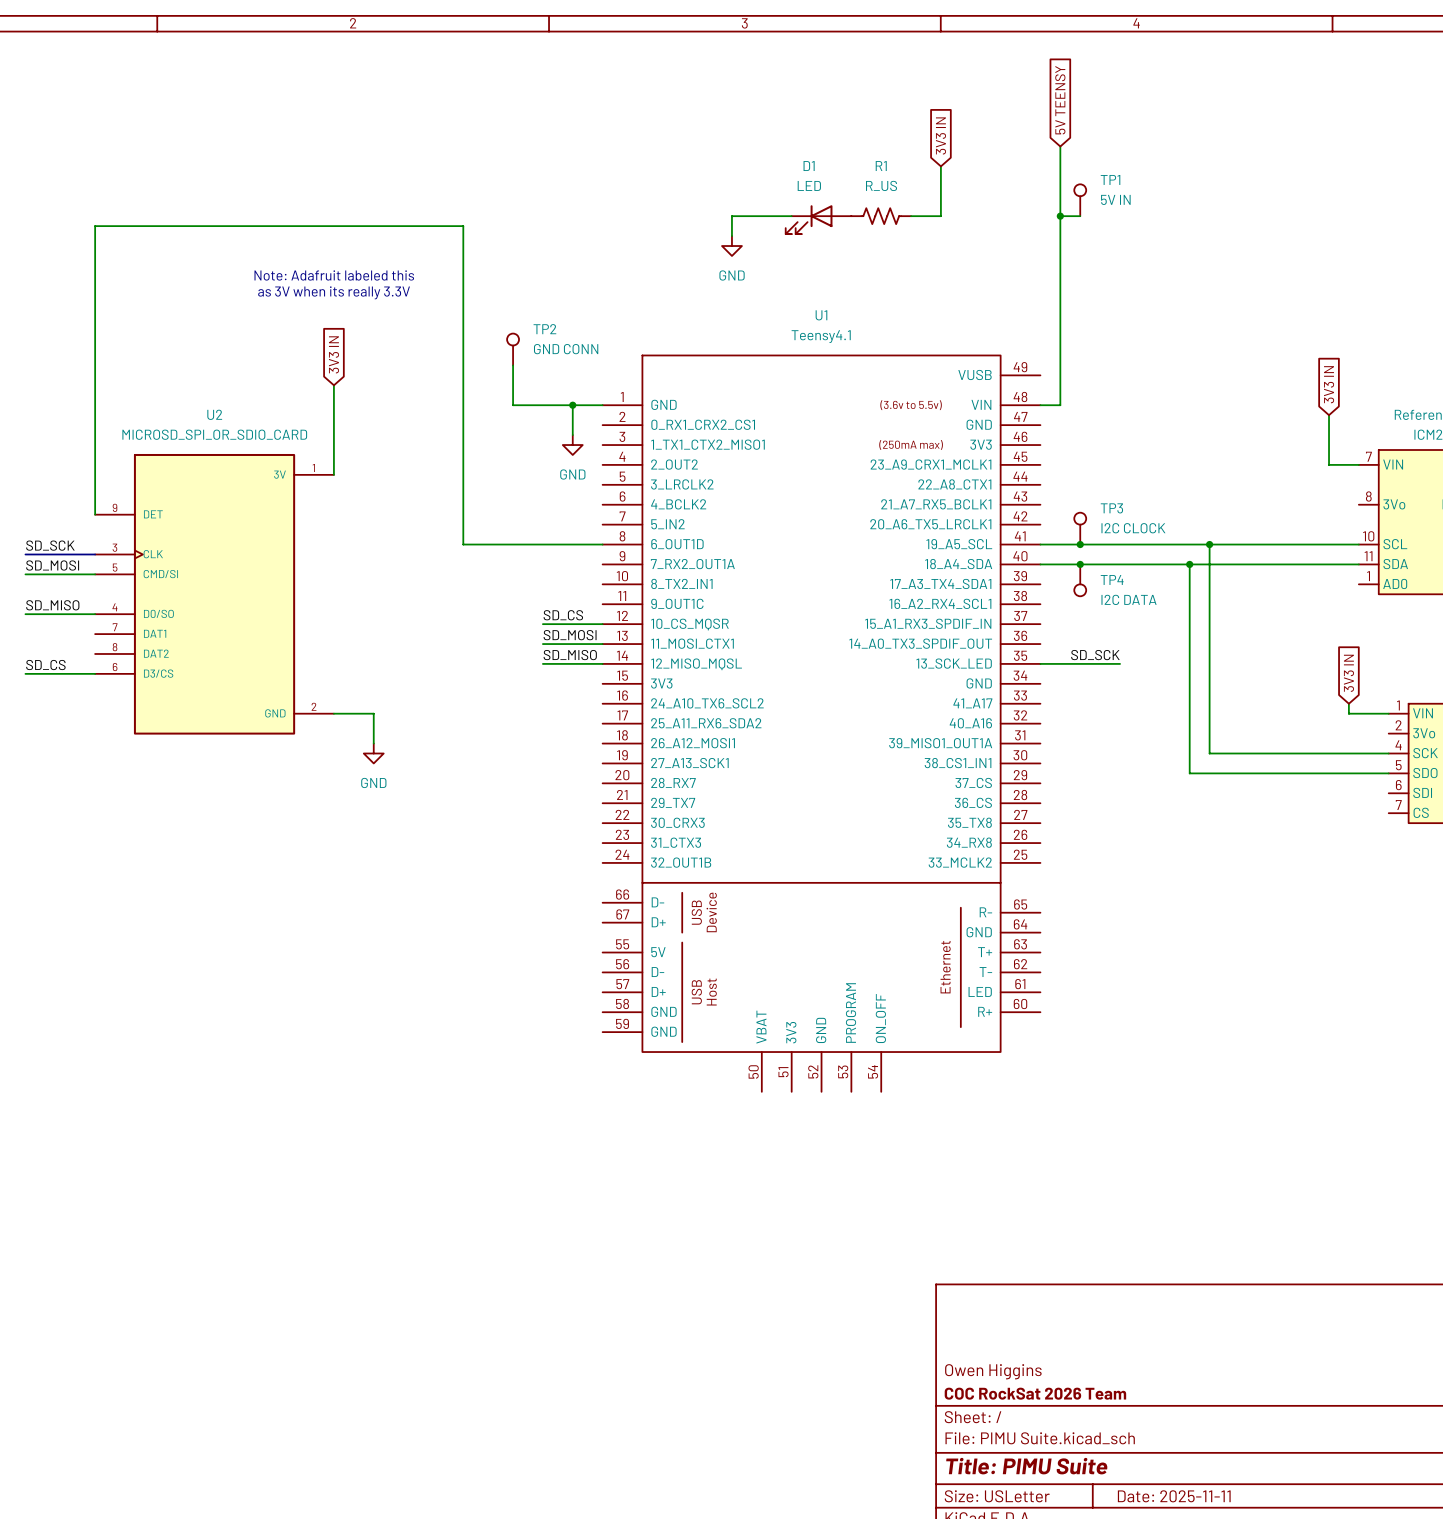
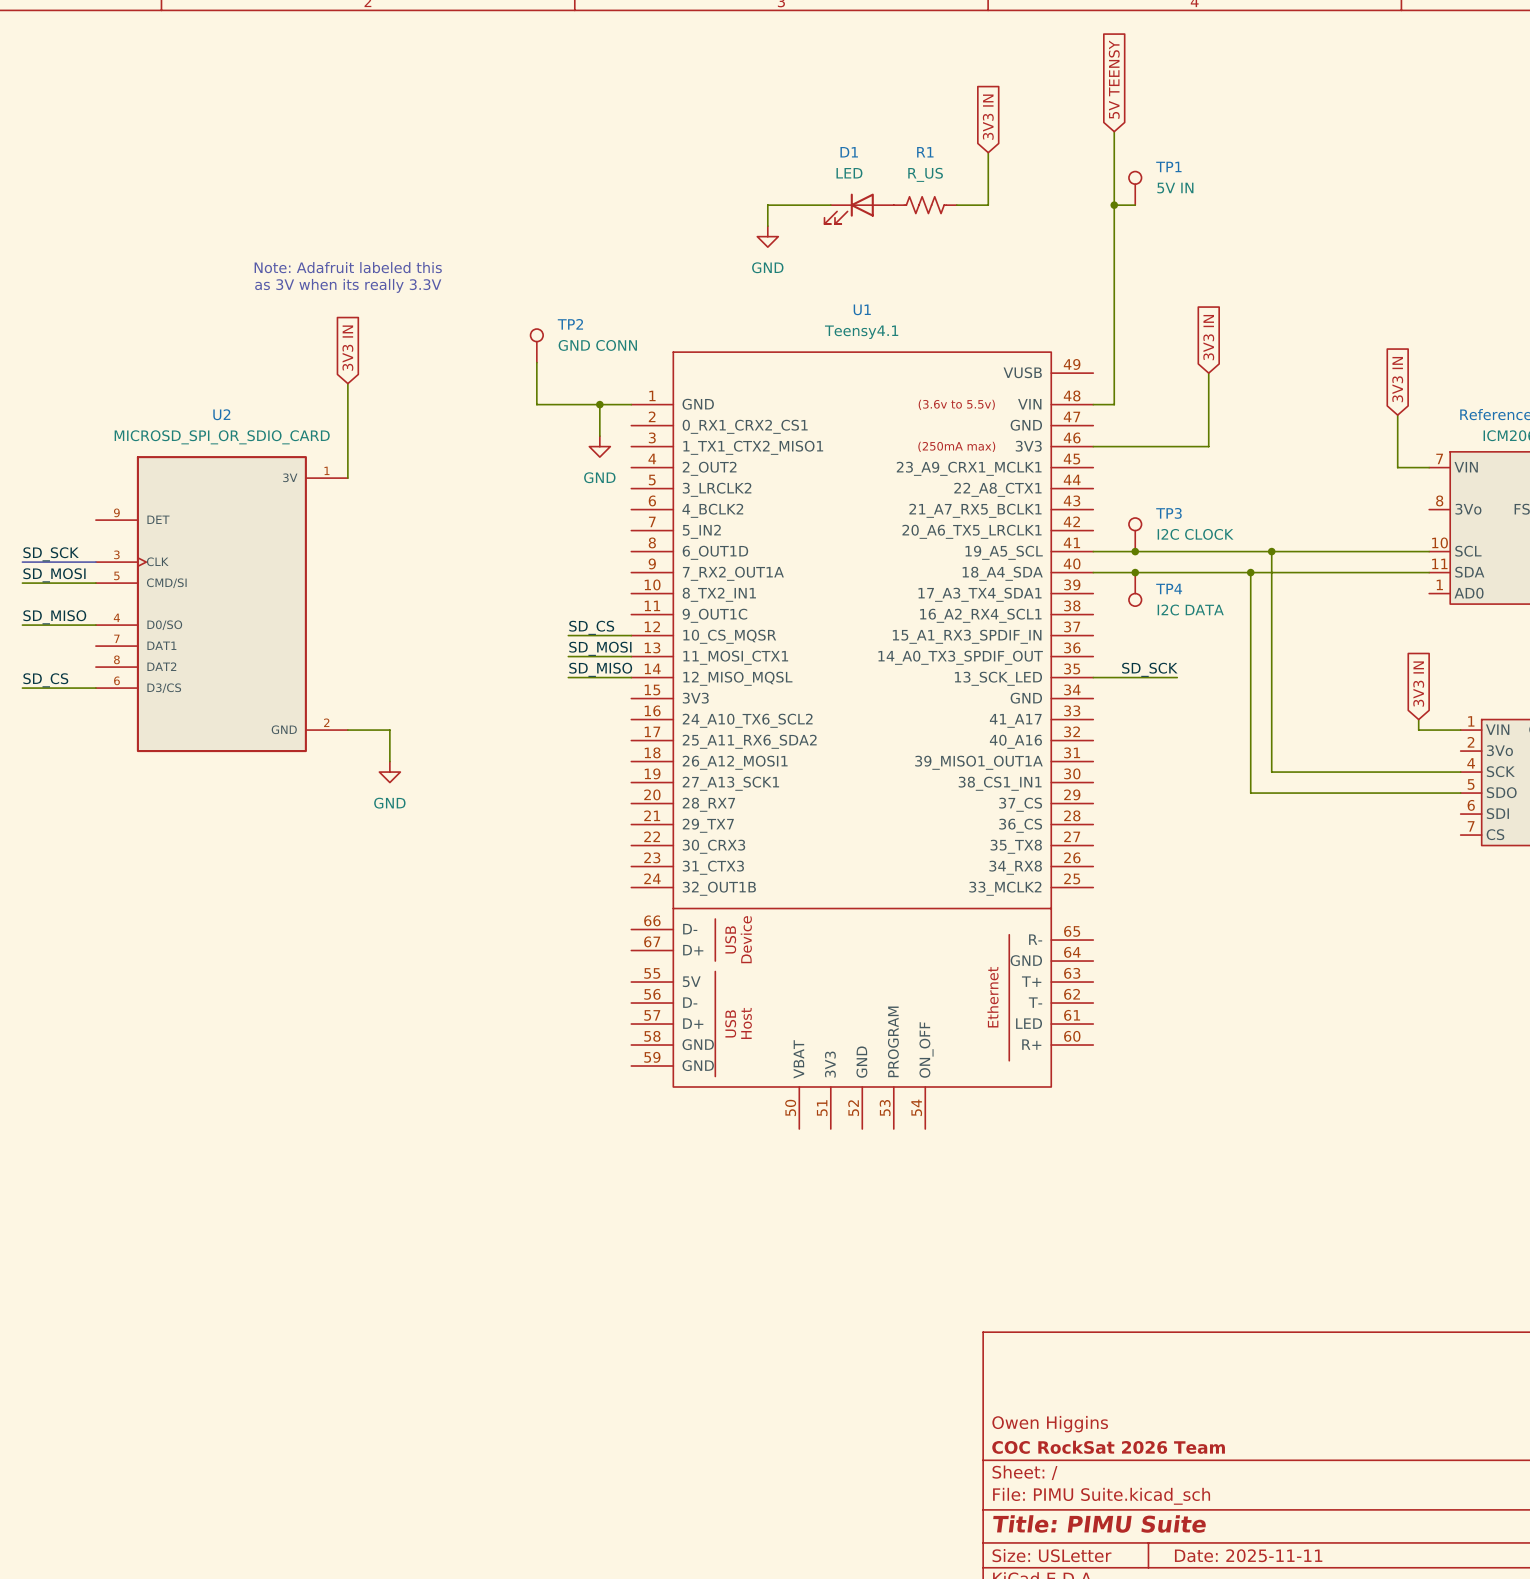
global label: none -> 3V3 IN (1208, 337)
wire: none -> (1208, 373) (1208, 446) (1093, 446)
wire: (95, 514) (95, 226) (463, 226) (463, 544) (602, 544) -> none

